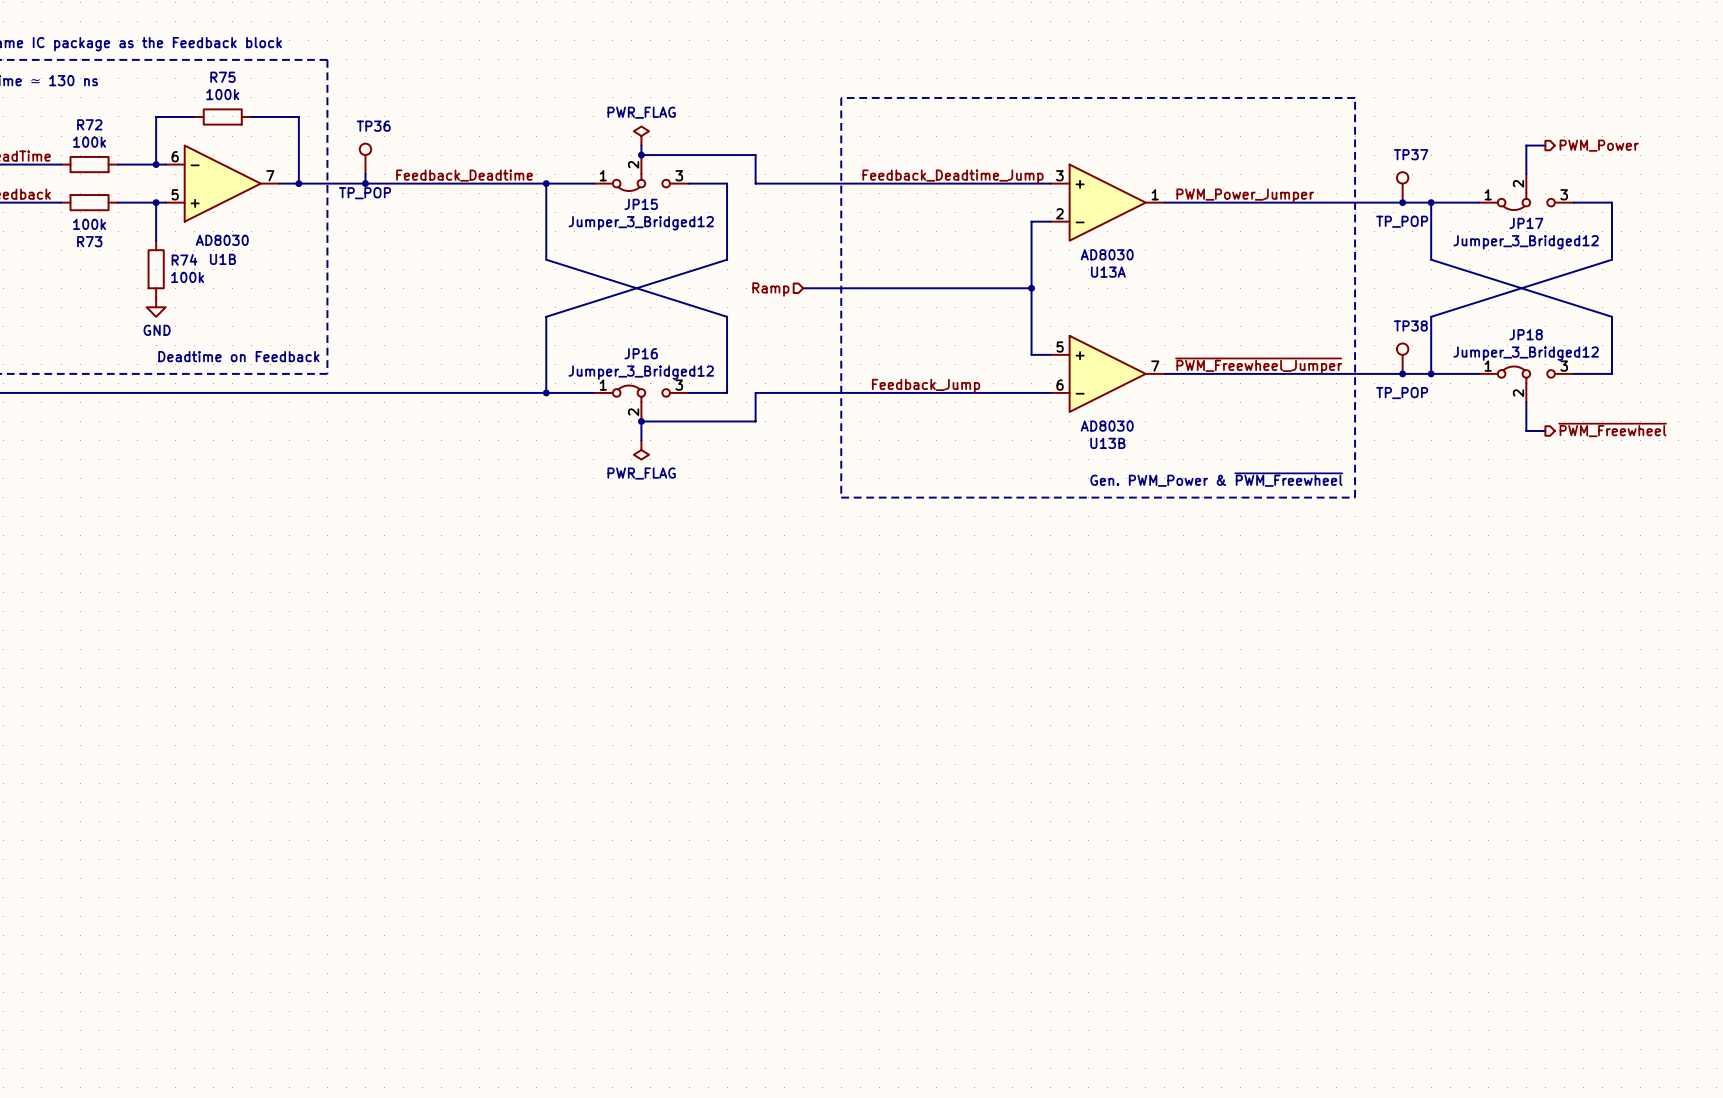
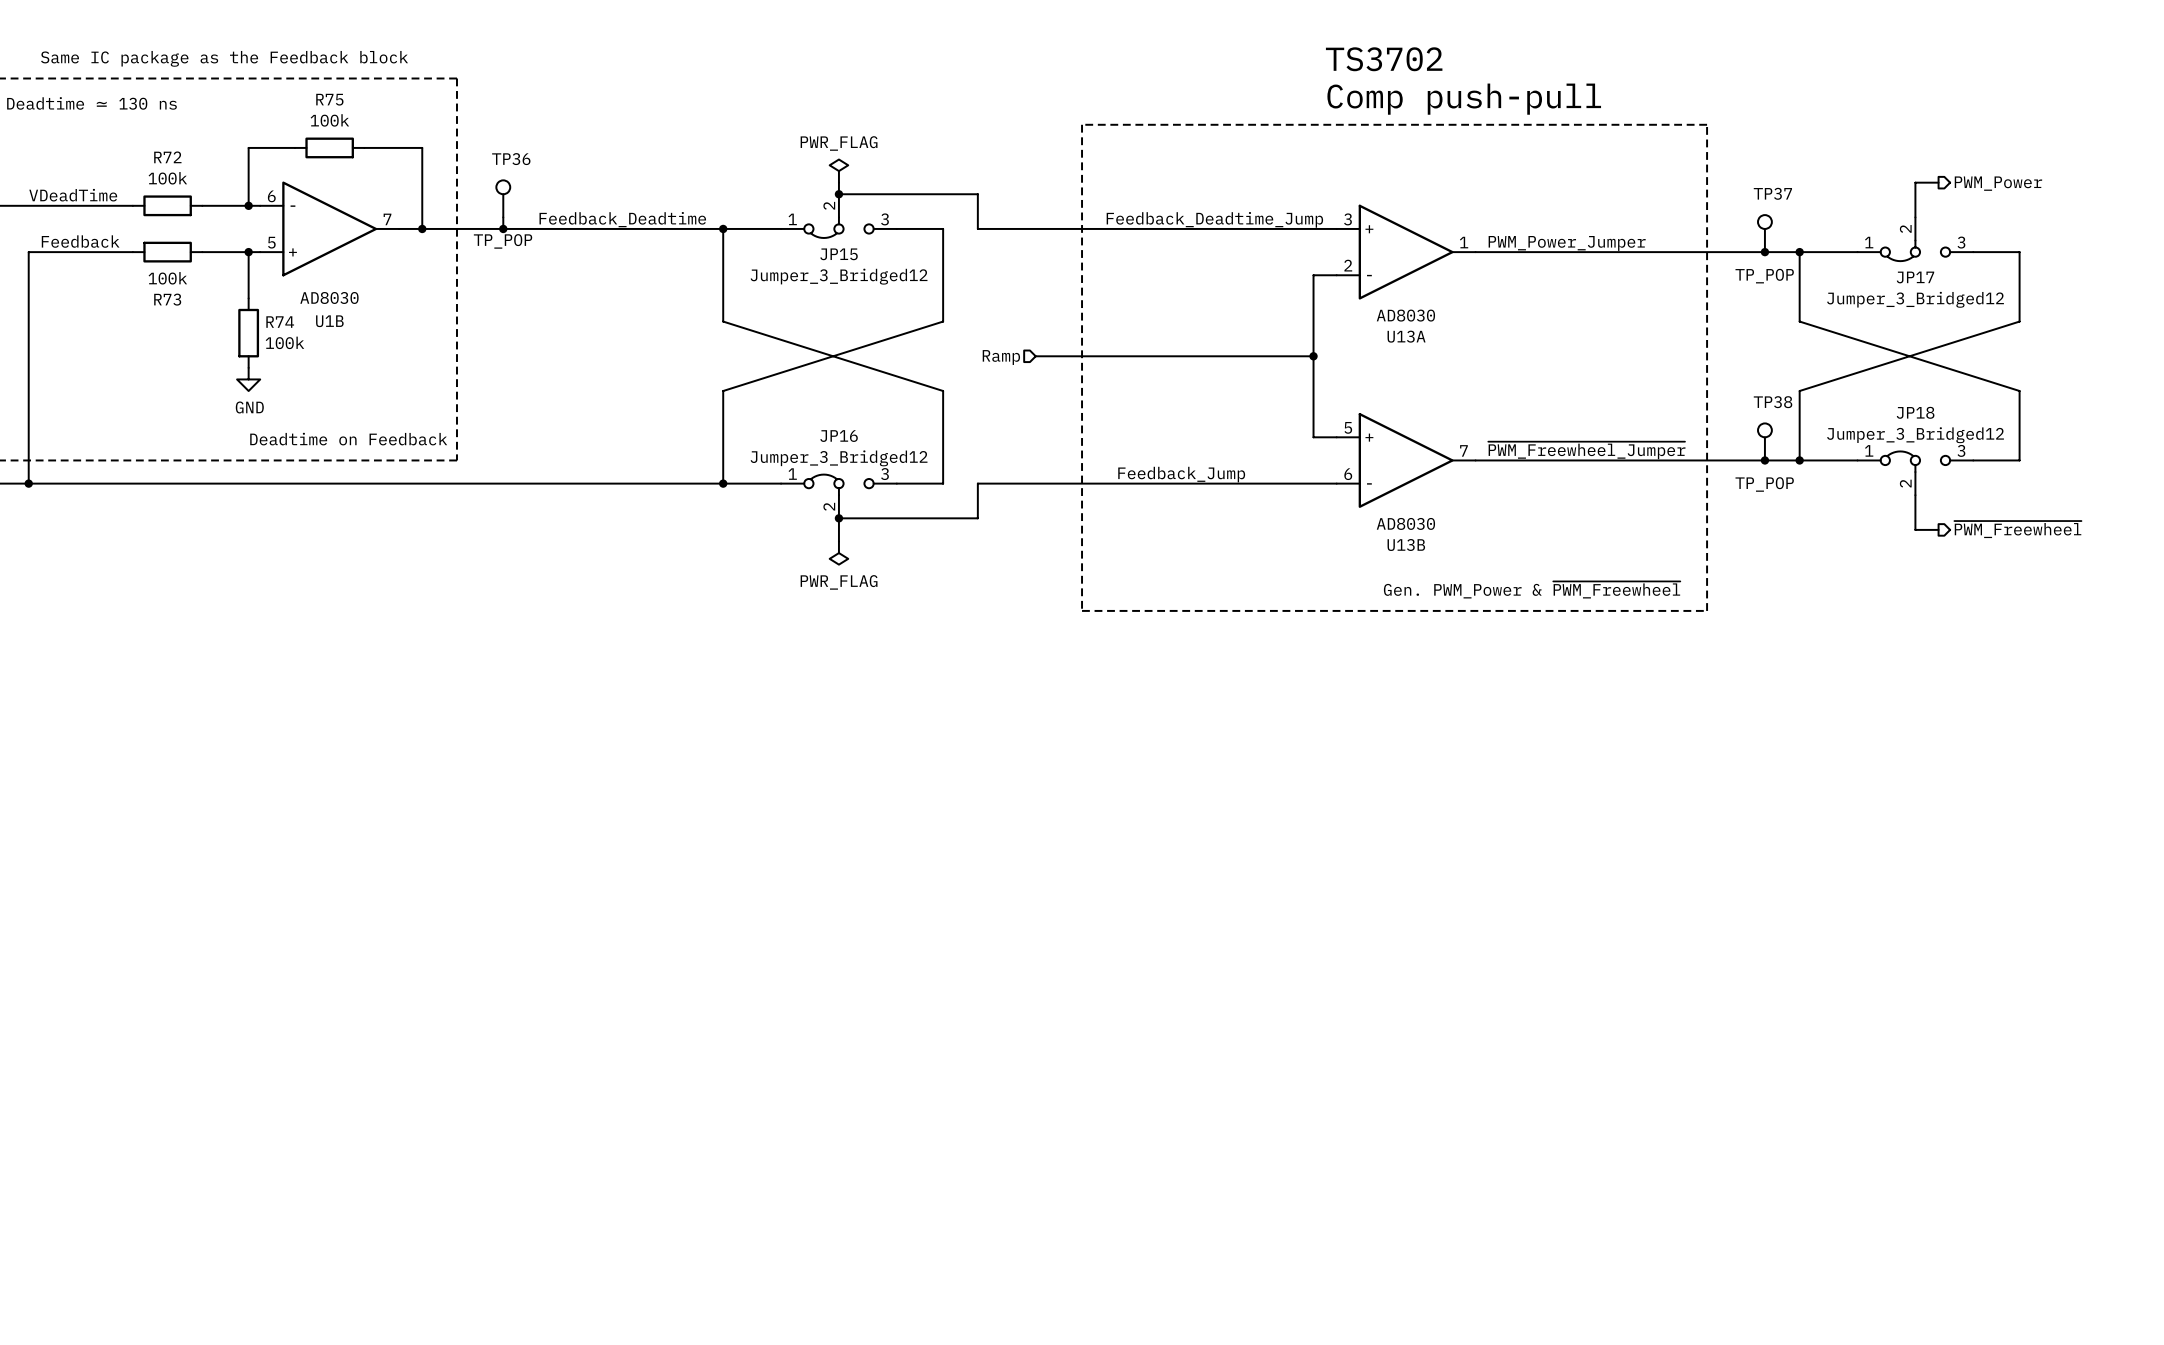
text: none -> TS3702 (1384, 59)
text: none -> Comp push-pull (1464, 99)

